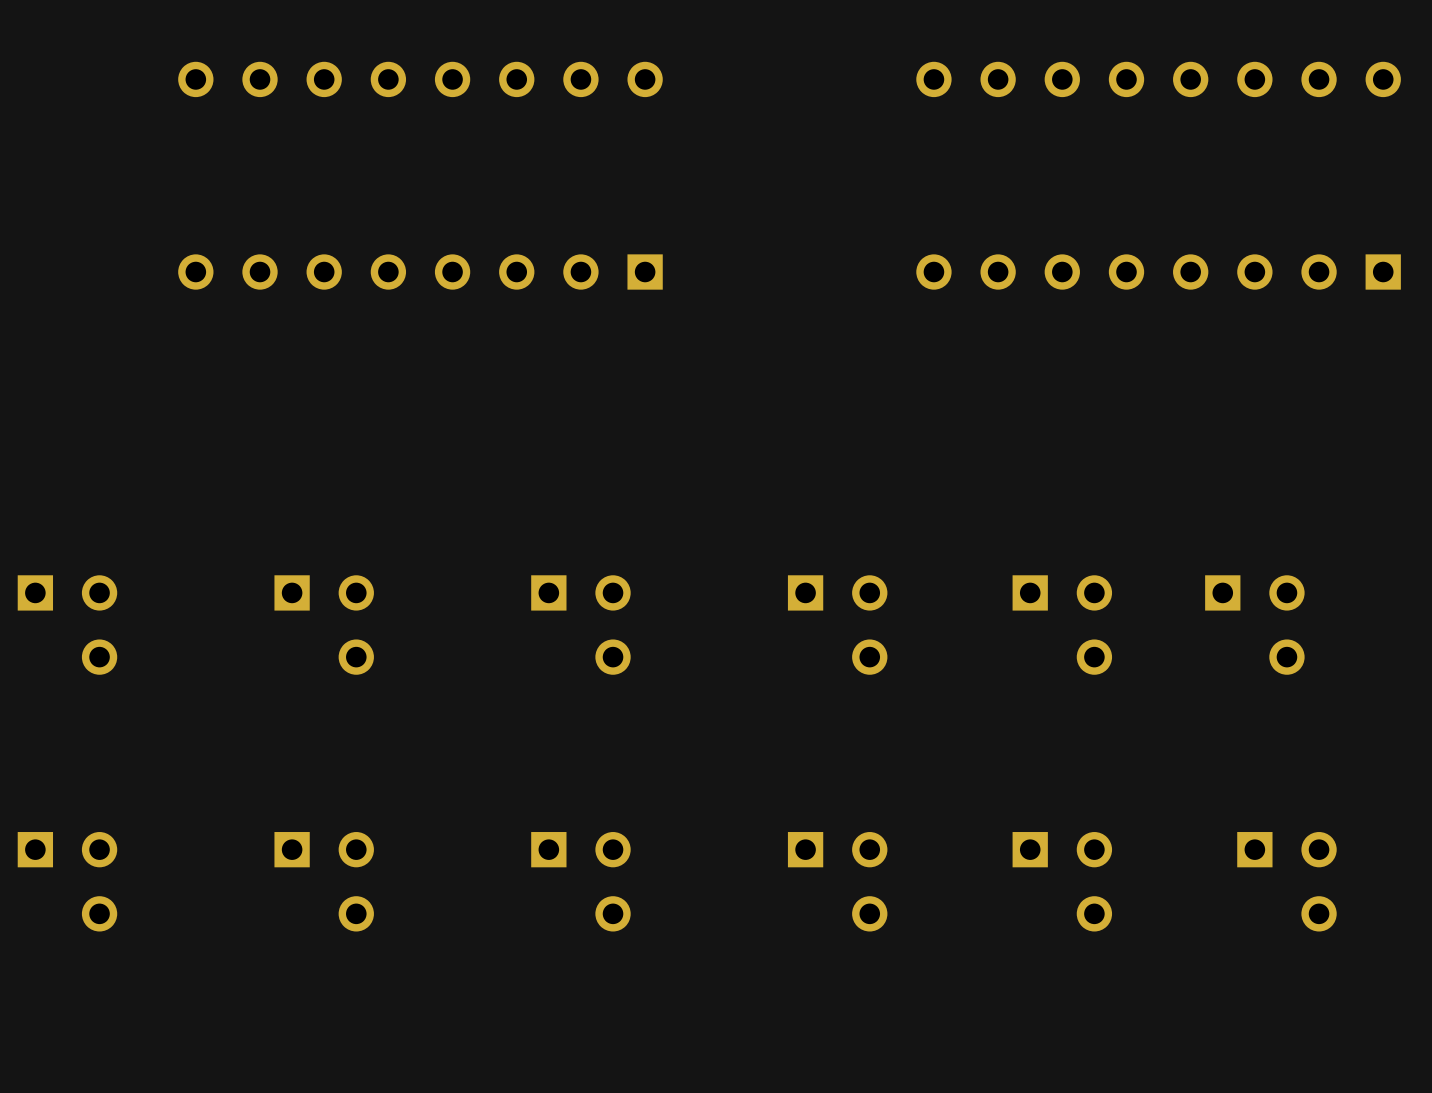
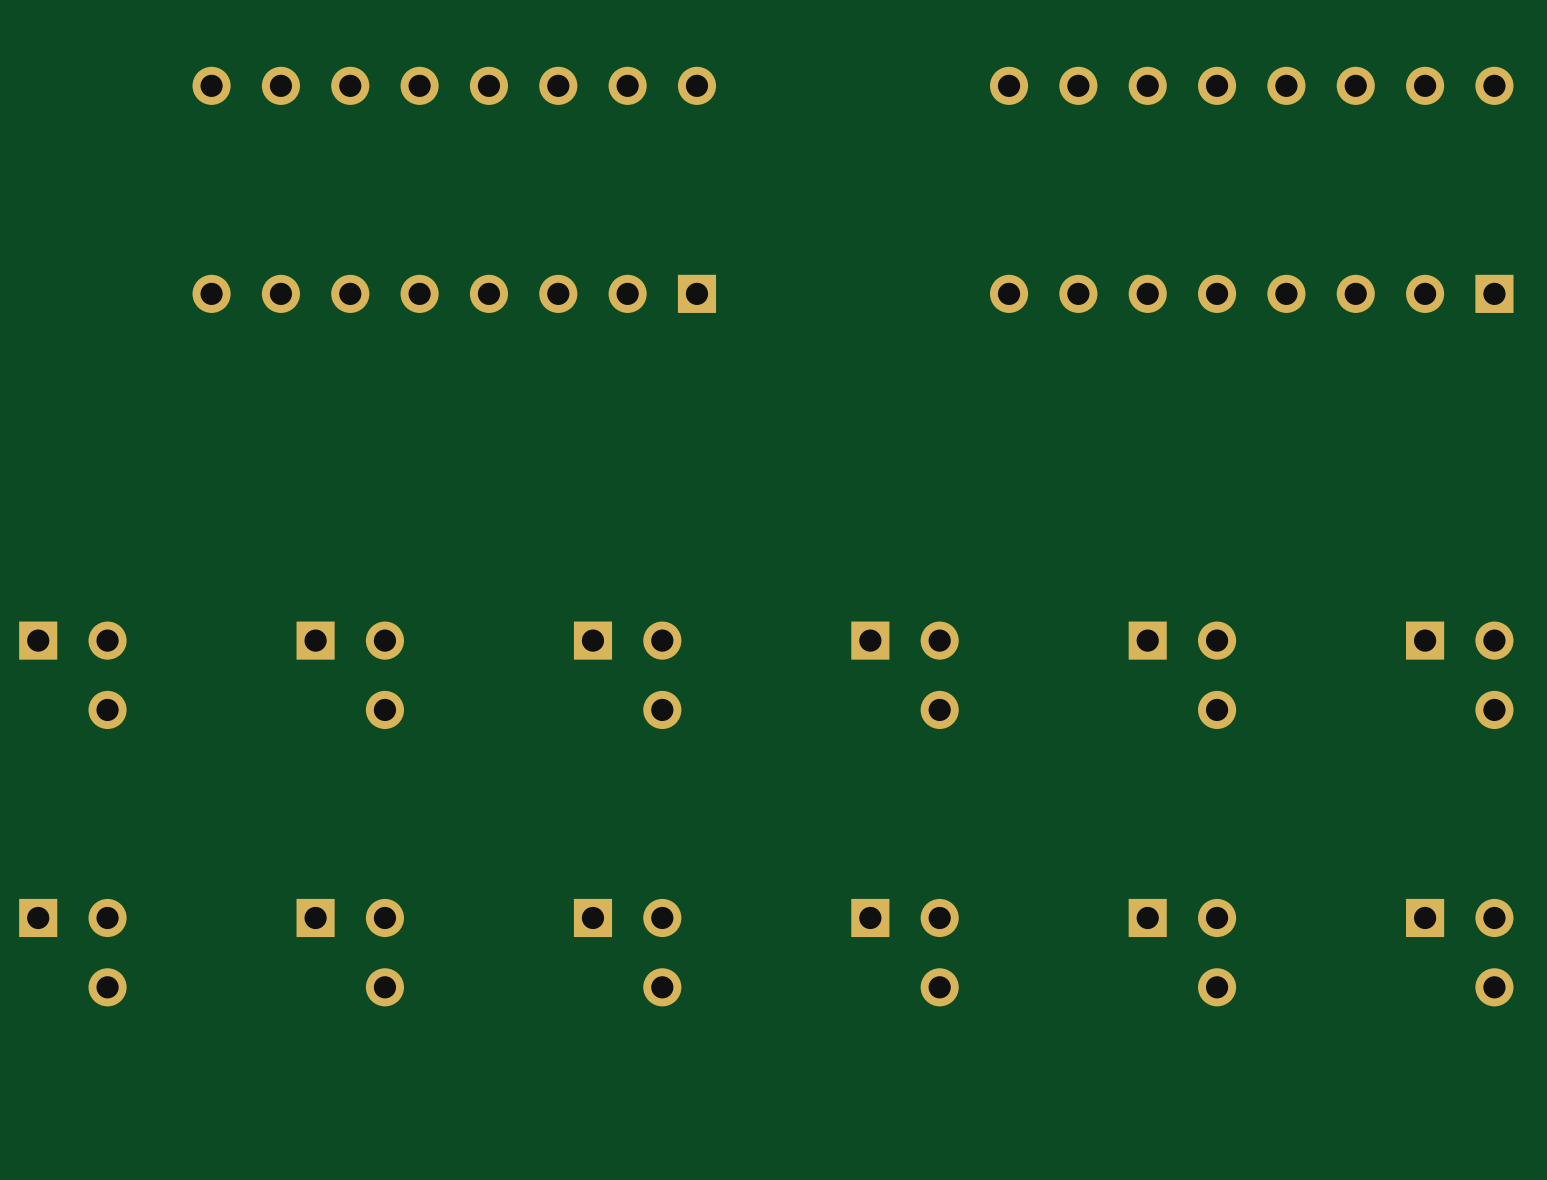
part position: (1062, 625) -> (1182, 675)
part: (1254, 625) -> none
part: none -> (1459, 675)
part position: (1062, 881) -> (1182, 952)
part position: (1286, 881) -> (1459, 952)

